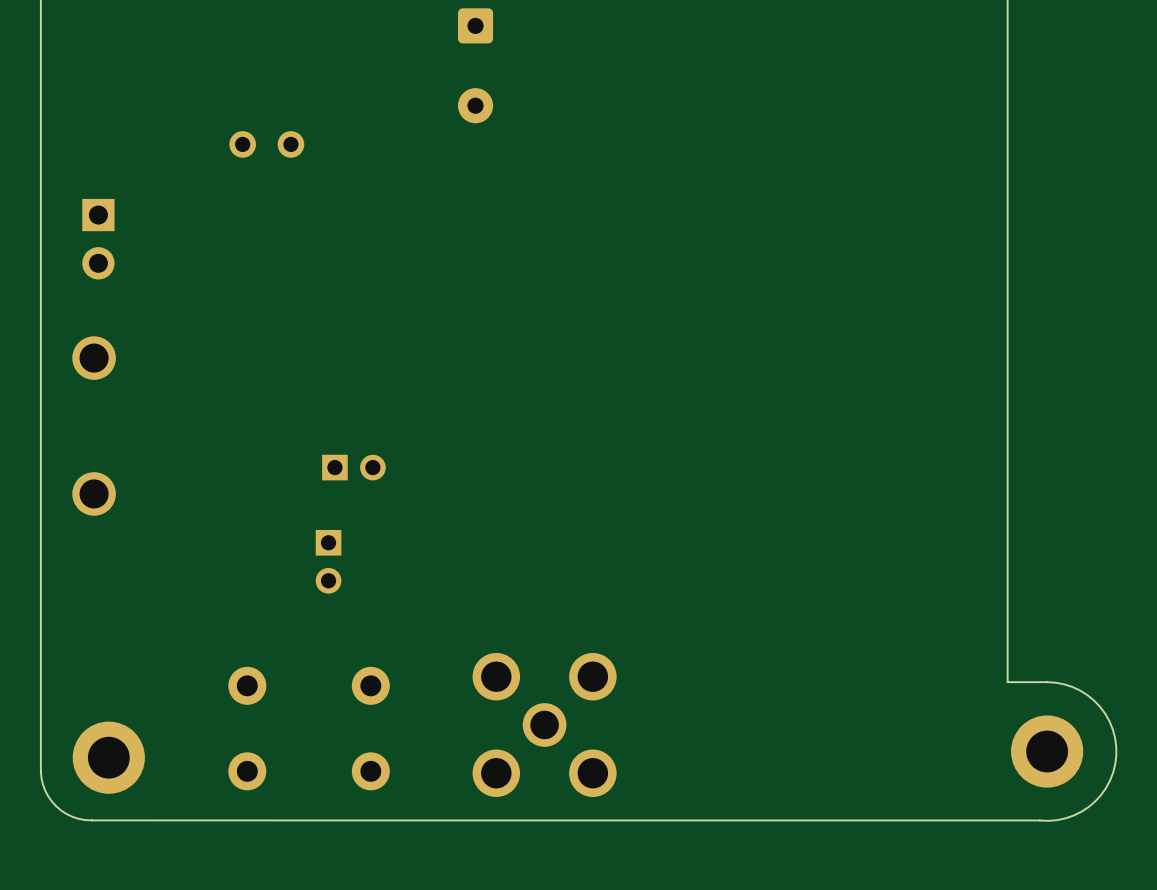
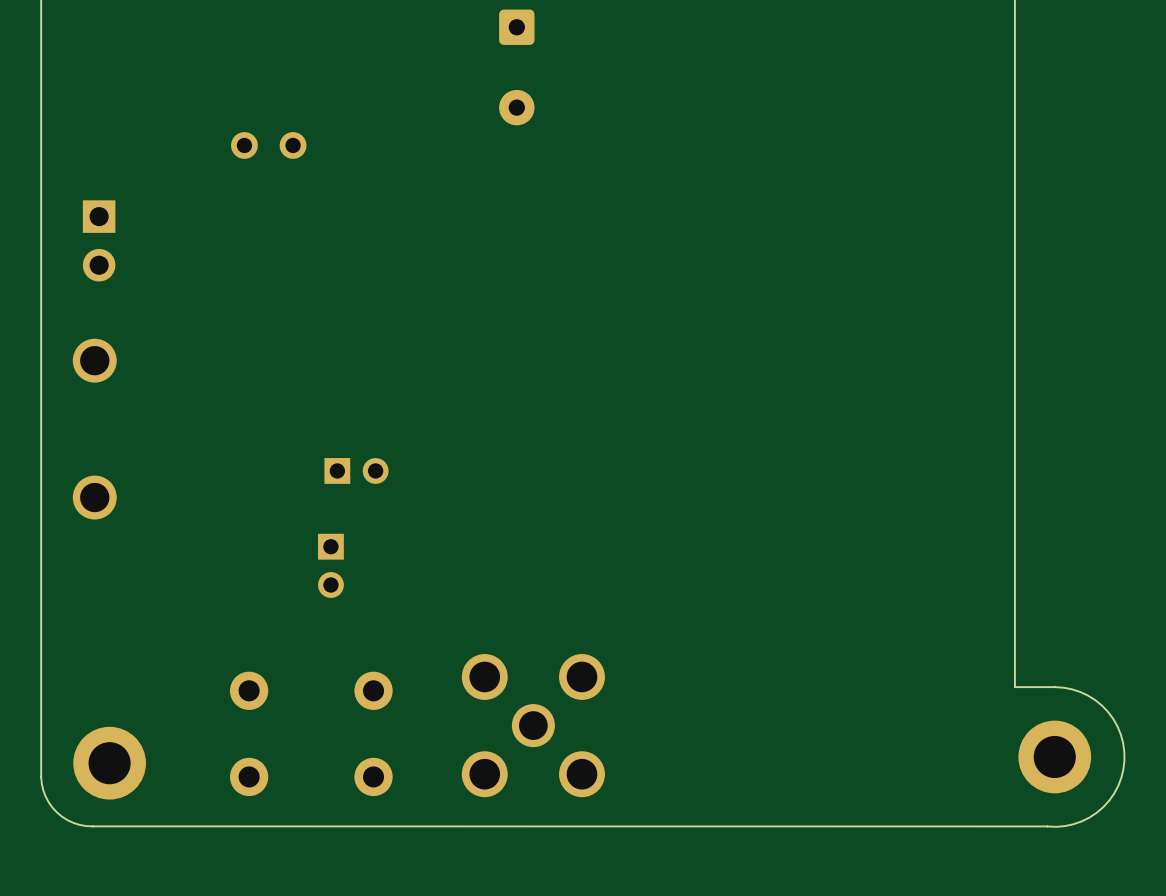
part position: (475, 65) -> (516, 67)
part footprint: [472, 652, 617, 798] -> [461, 654, 605, 798]

